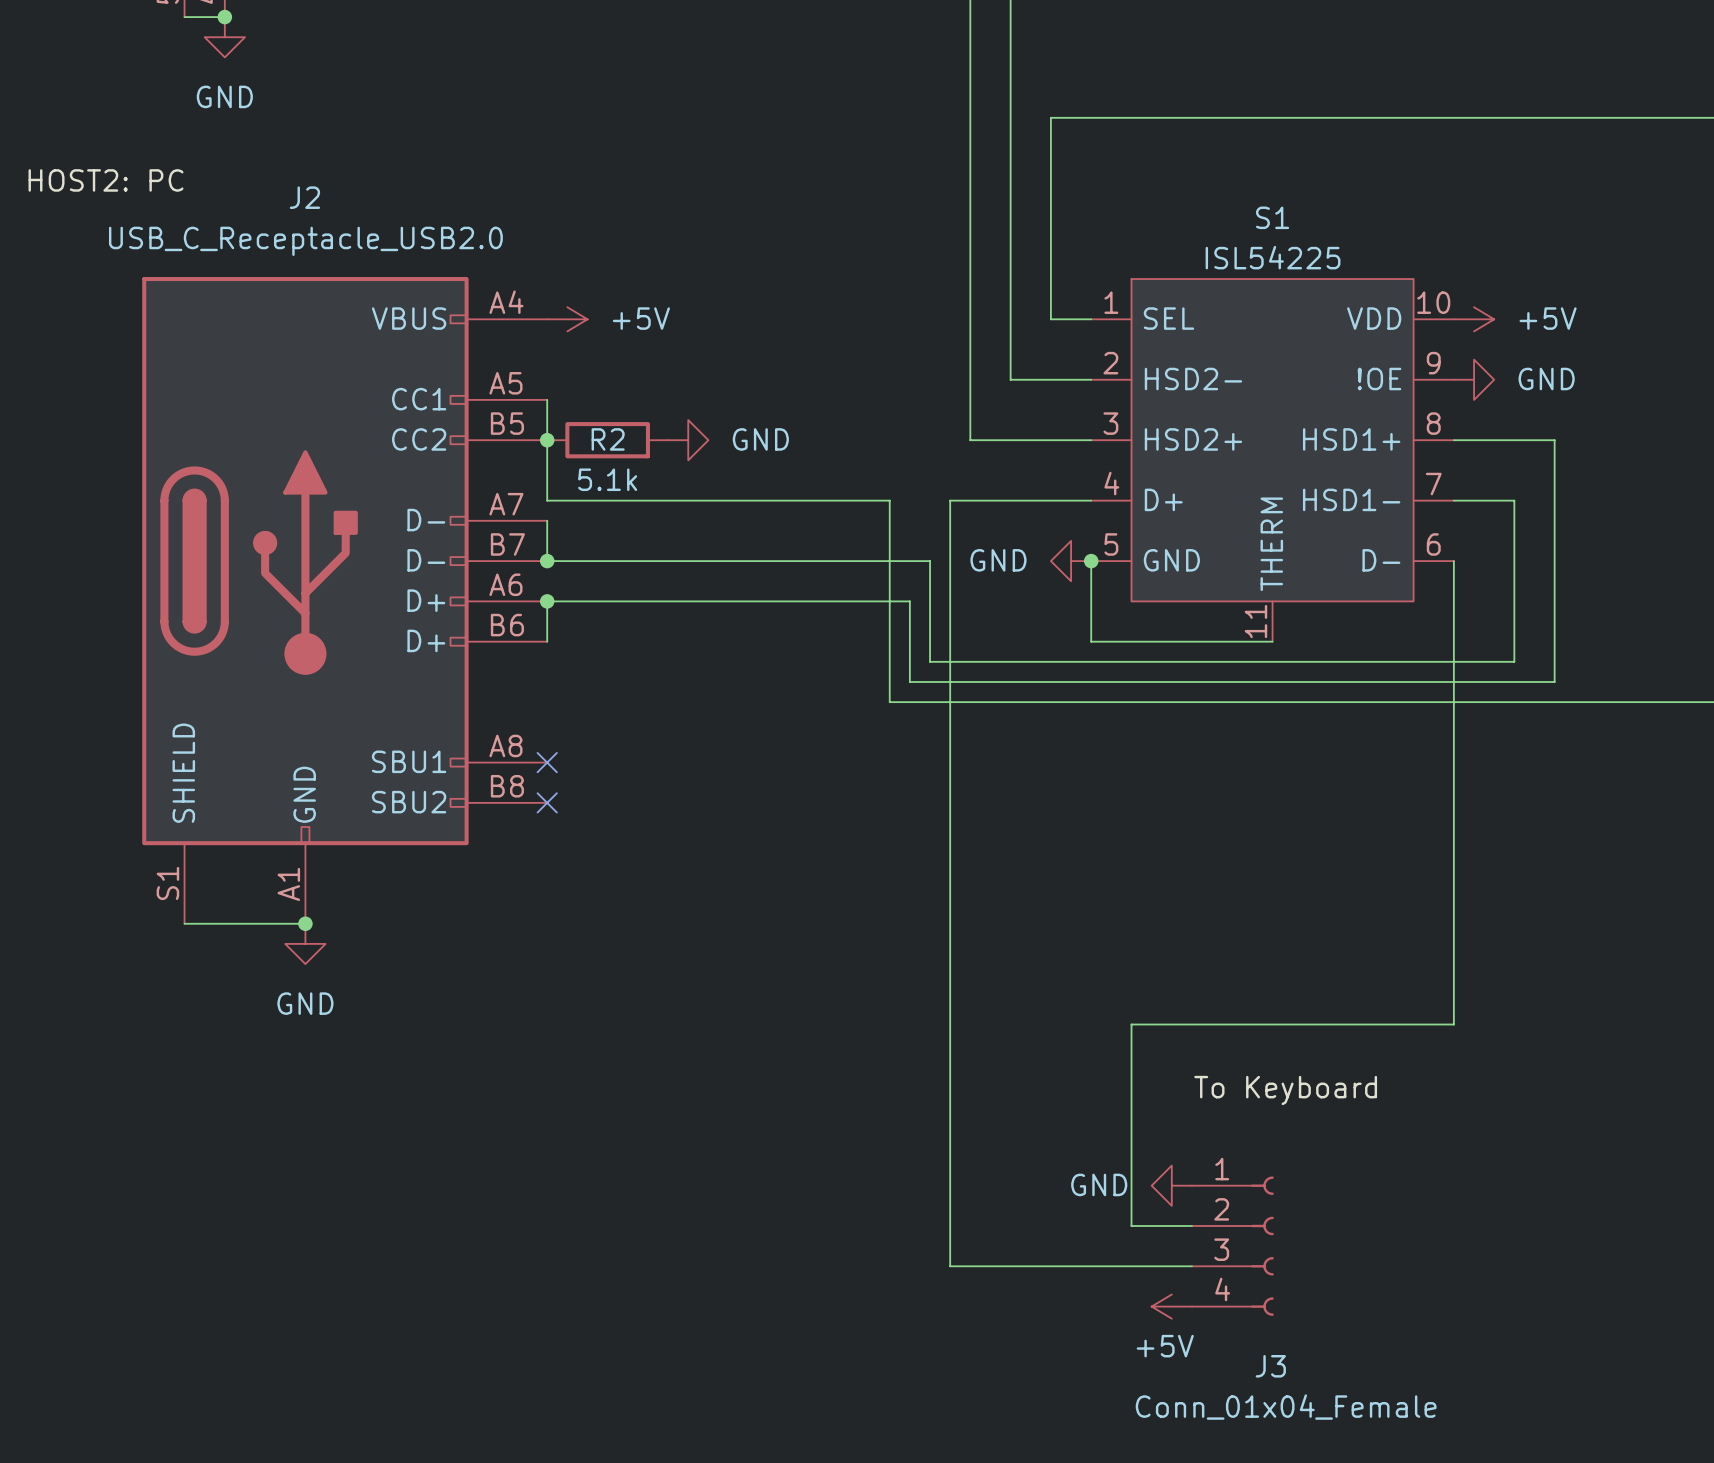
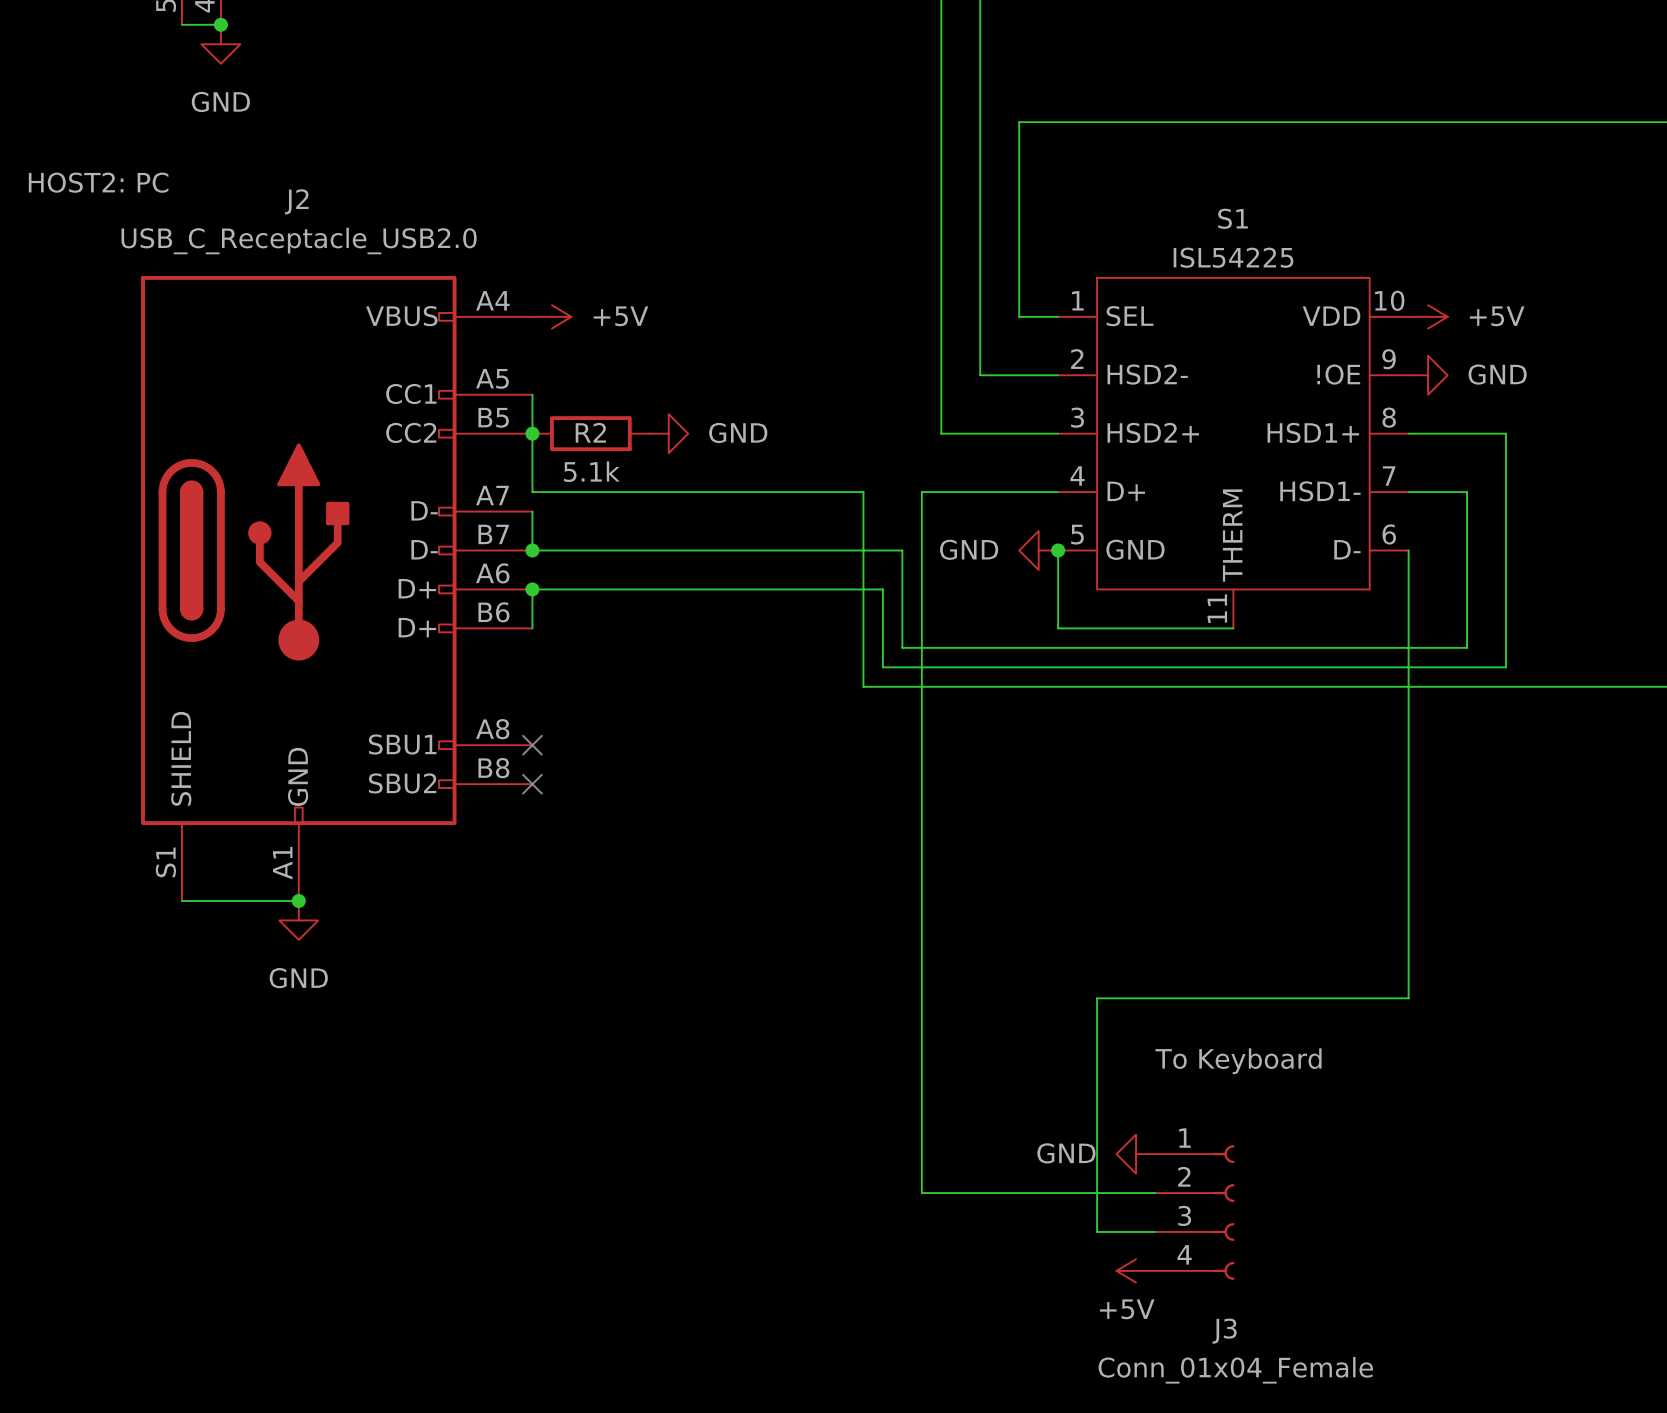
wire: (950, 1225) (950, 1266) (1131, 1266) -> (921, 1193) (1097, 1193) (1097, 1231)

